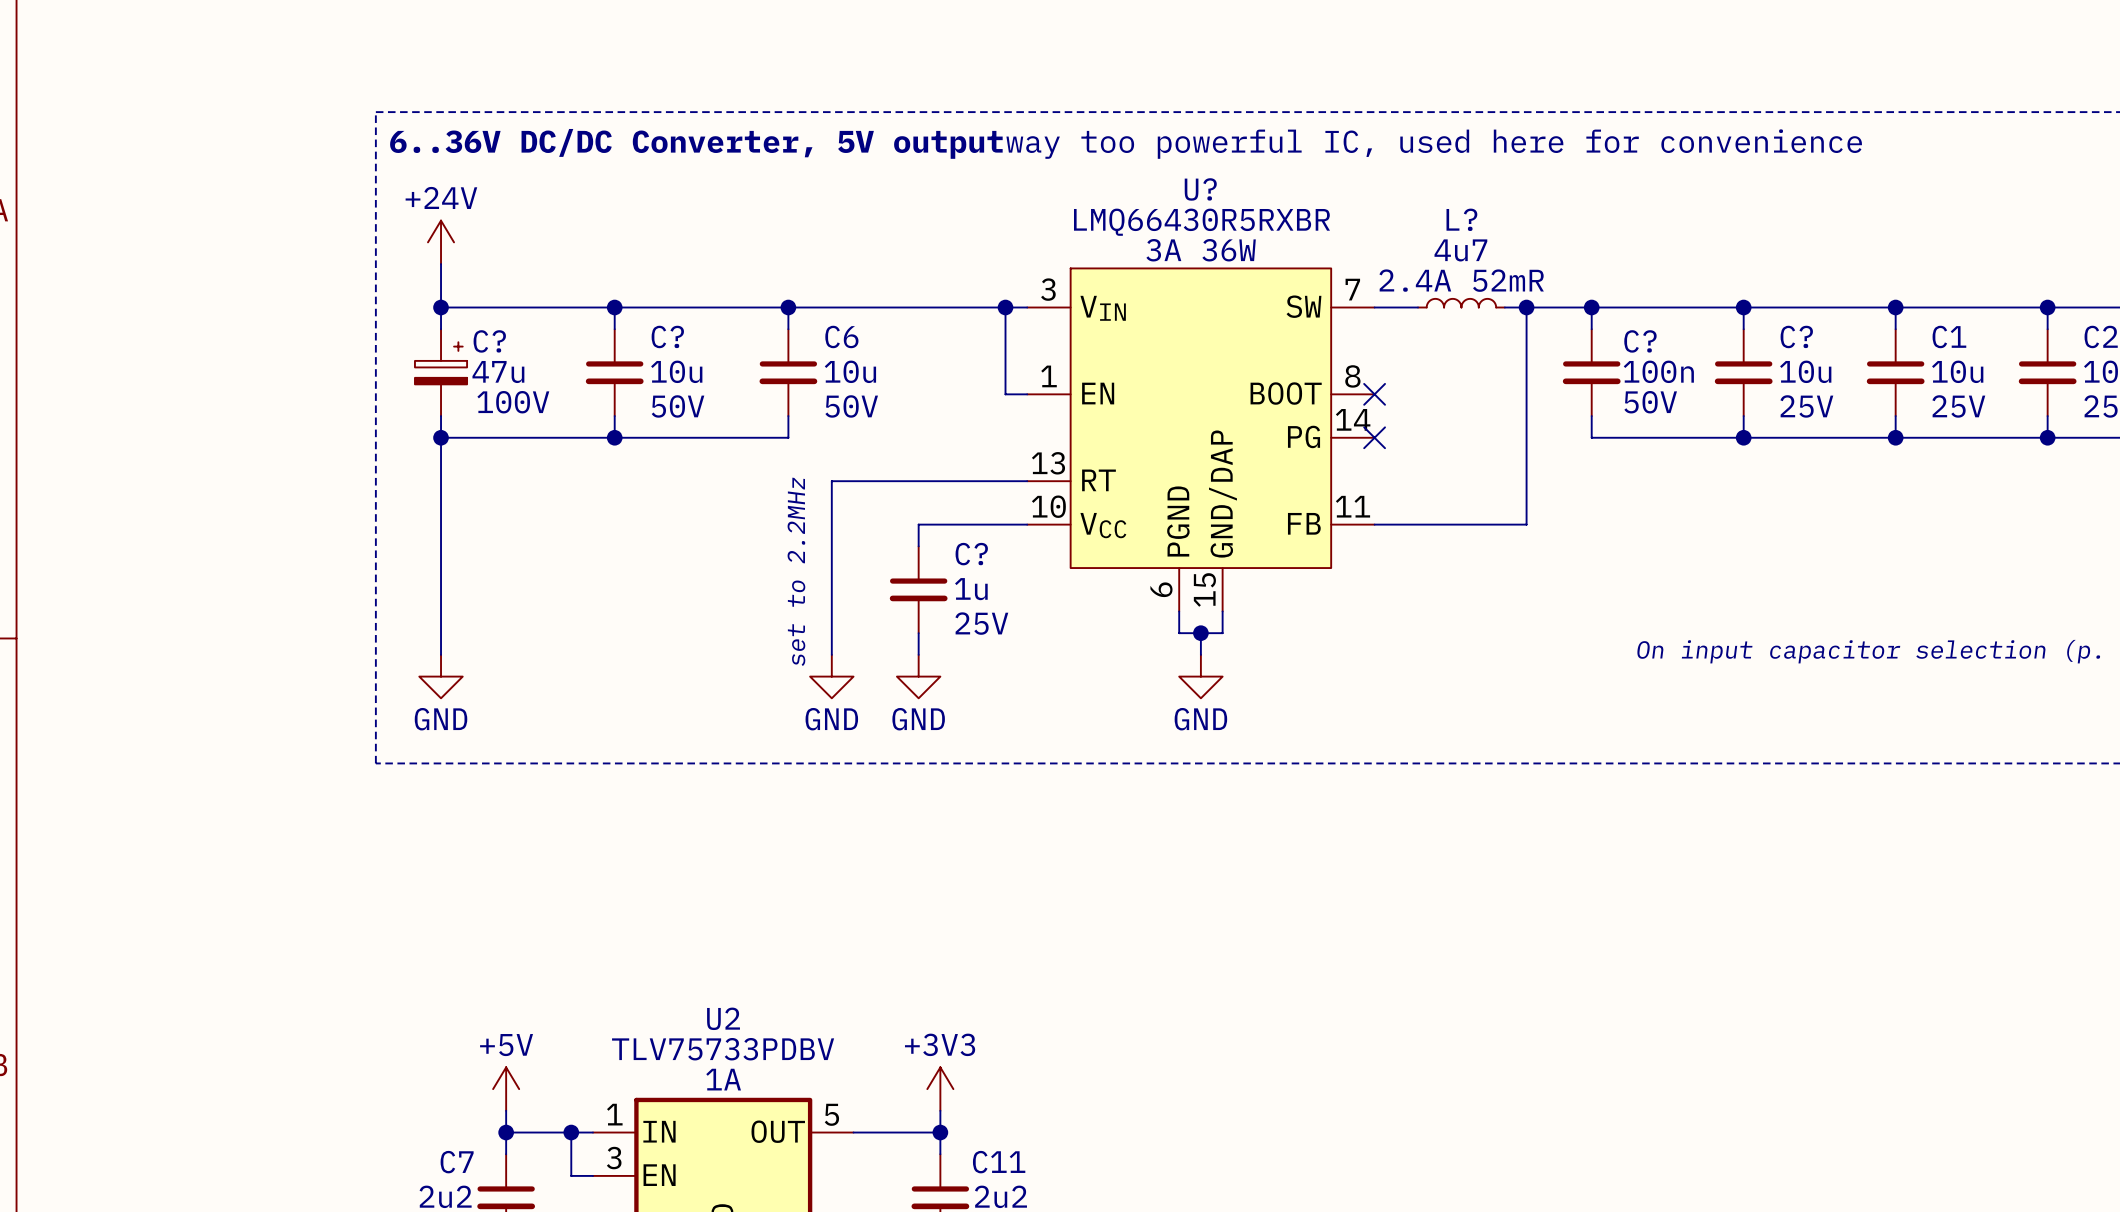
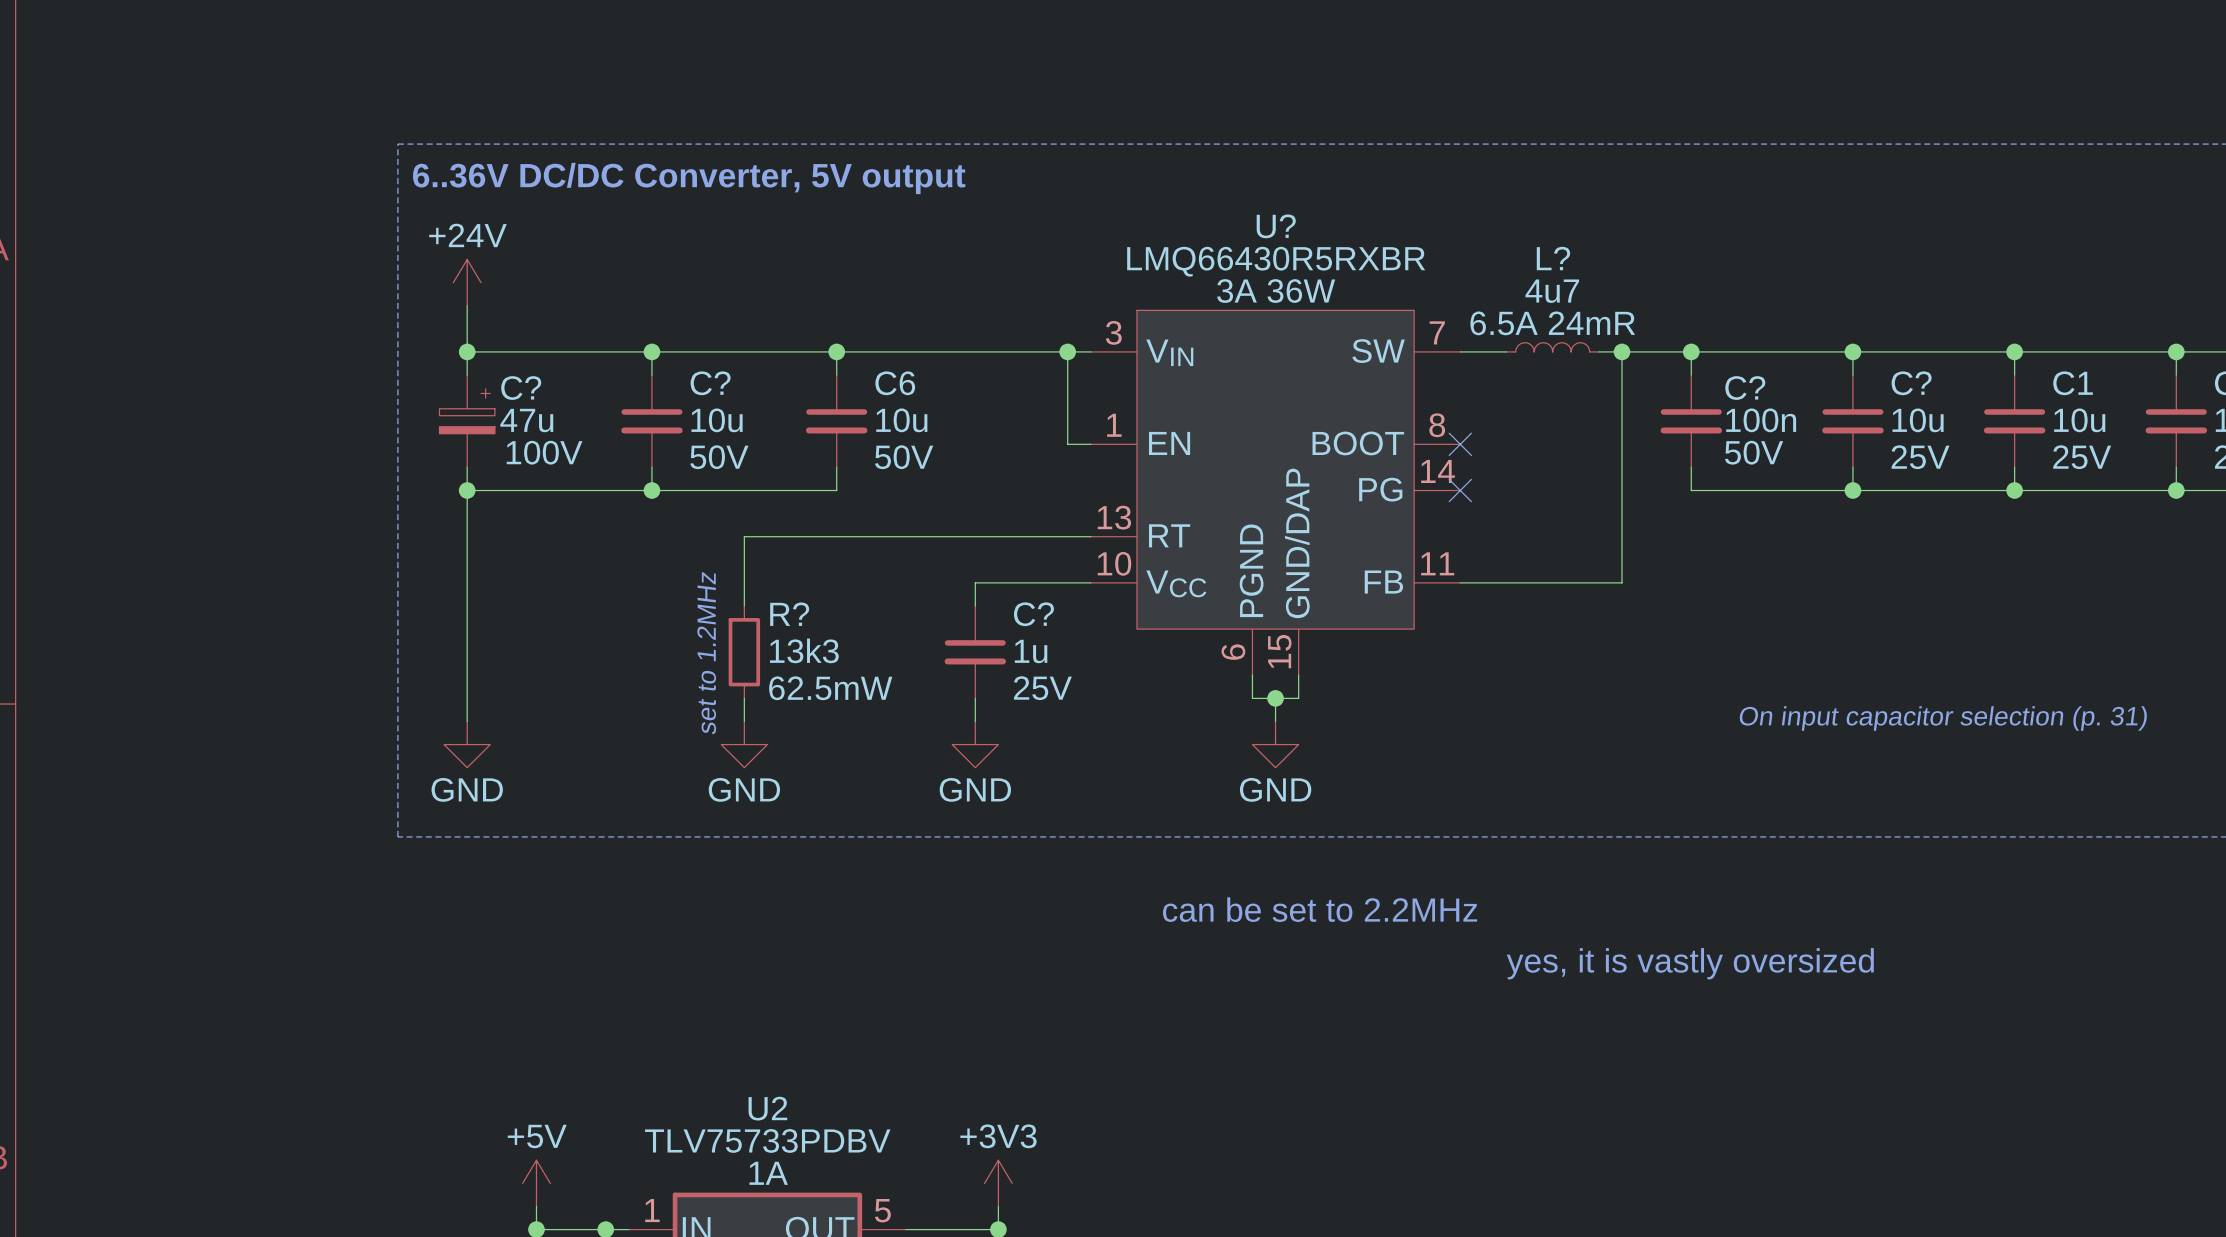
text: way too powerful IC, used here for convenience (1434, 144) -> none
L? text: 2.4A 52mR (1461, 280) -> 6.5A 24mR (1552, 323)
wire: (831, 481) (831, 654) -> (882, 536) (744, 536) (744, 606)
text: none -> set to 1.2MHz (706, 653)
text: set to 2.2MHz (796, 571) -> none
R?: none -> 13k3 (744, 652)
wire: none -> (744, 698) (744, 721)
power symbol position: GND (831, 676) -> GND (744, 744)
text: none -> can be set to 2.2MHz (1320, 909)
text: none -> yes, it is vastly oversized (1690, 963)

